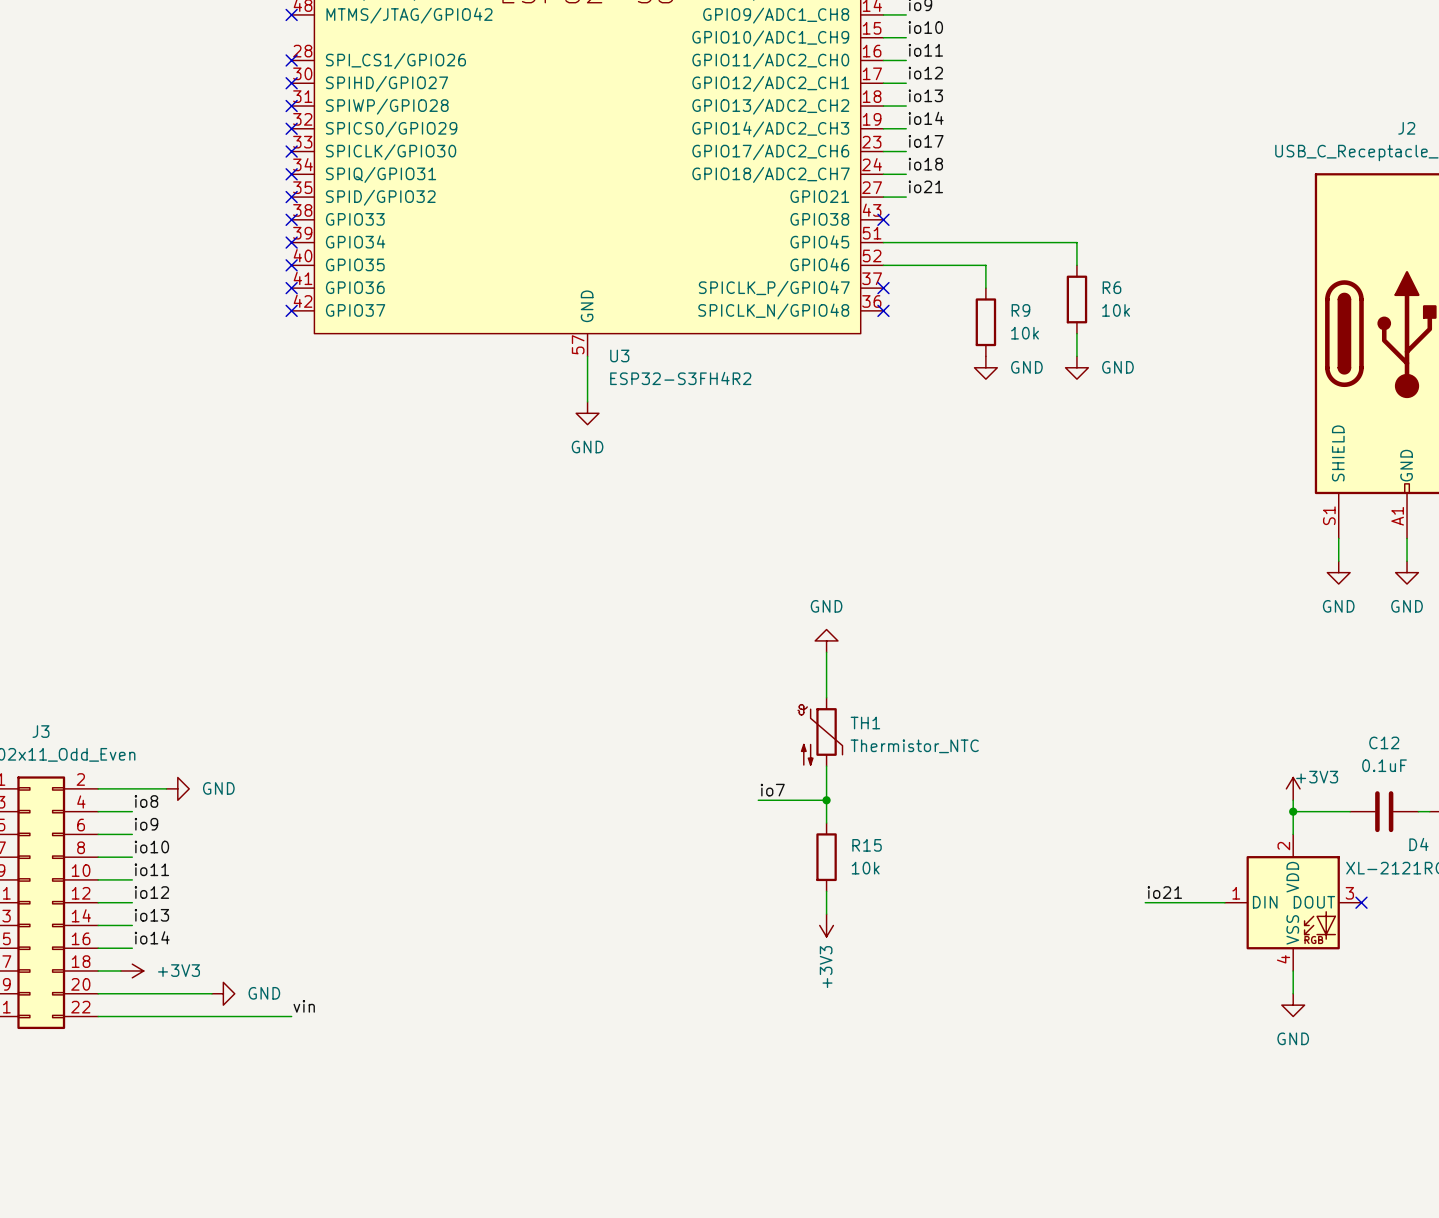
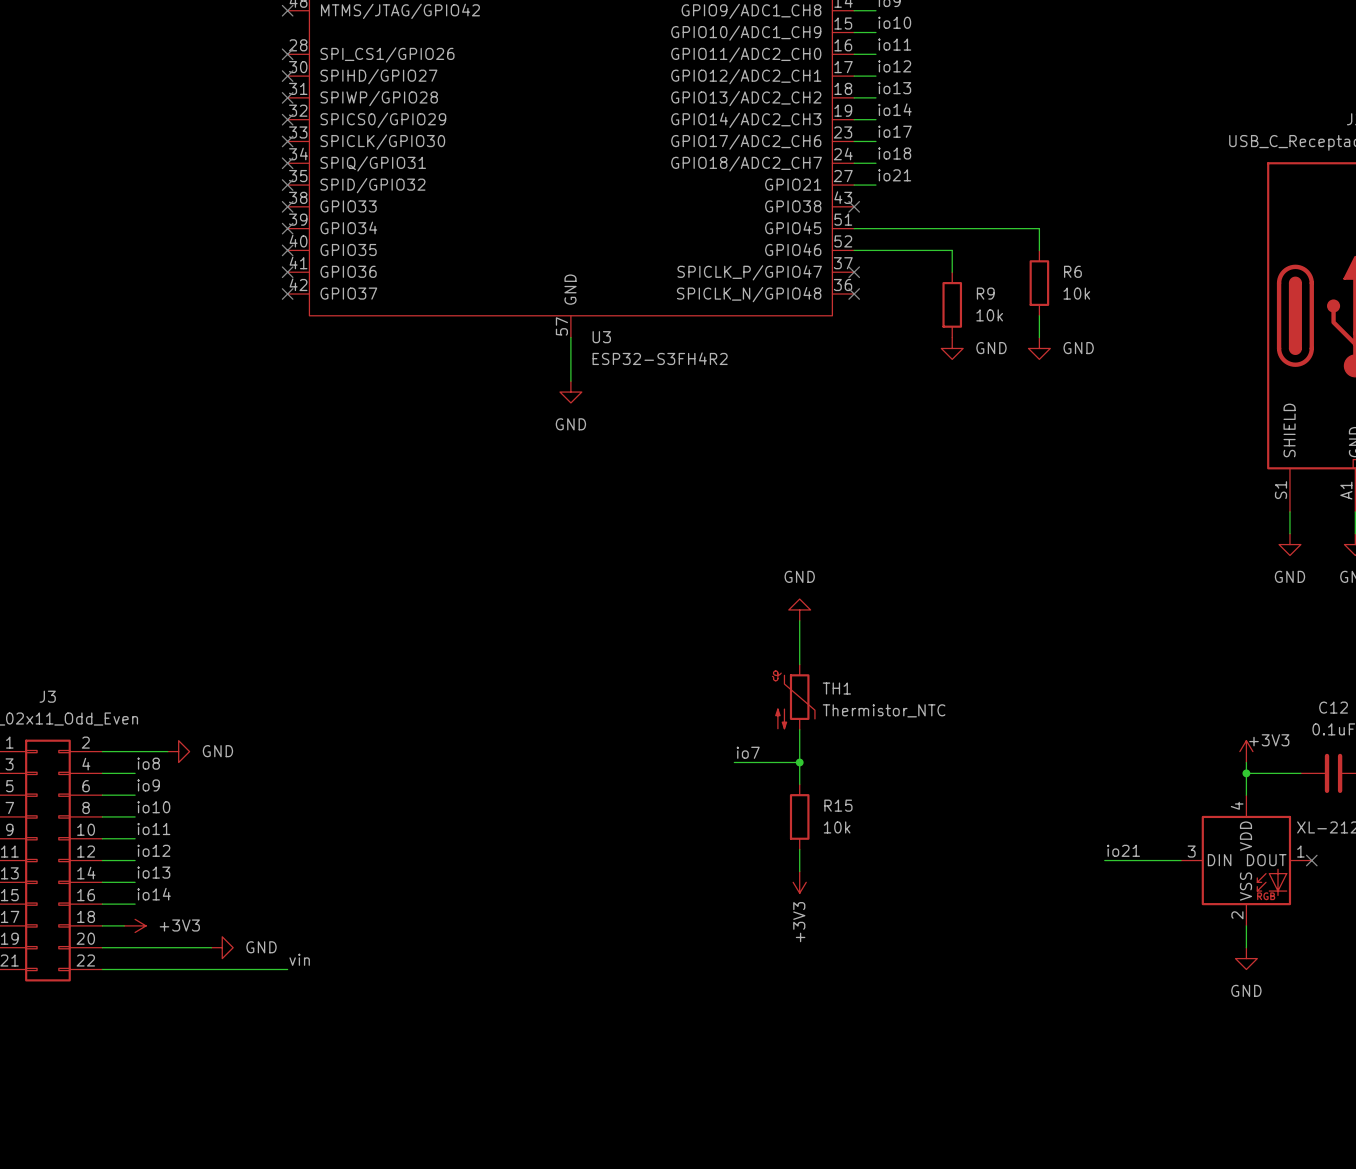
D4 pin number: 2 (1283, 846) -> 4 (1237, 805)
D4 pin number: 1 (1236, 893) -> 3 (1191, 851)
D4 pin number: 3 (1349, 893) -> 1 (1300, 851)
D4 pin number: 4 (1283, 959) -> 2 (1237, 915)

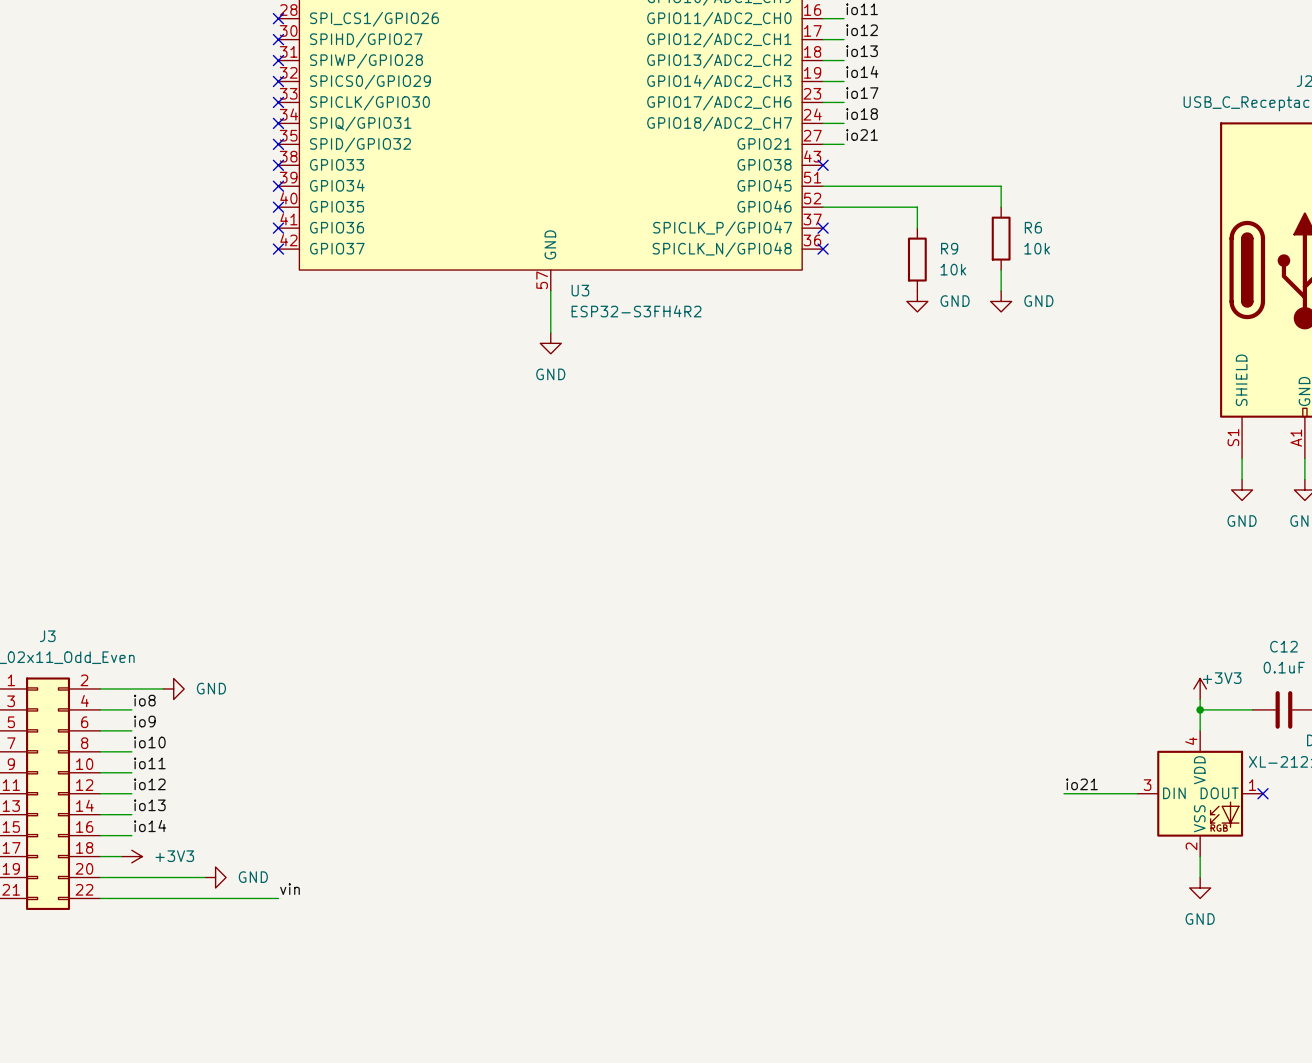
power symbol: GND (799, 609) -> none
wire: (799, 620) (799, 664) -> none
TH1: Thermistor_NTC (793, 697) -> none
wire: (799, 729) (799, 784) -> none
label: io7 (748, 752) -> none
wire: (734, 762) (799, 762) -> none
junction: (799, 762) -> none
R15: 10k (799, 816) -> none
wire: (799, 849) (799, 871) -> none
power symbol: +3V3 (799, 882) -> none

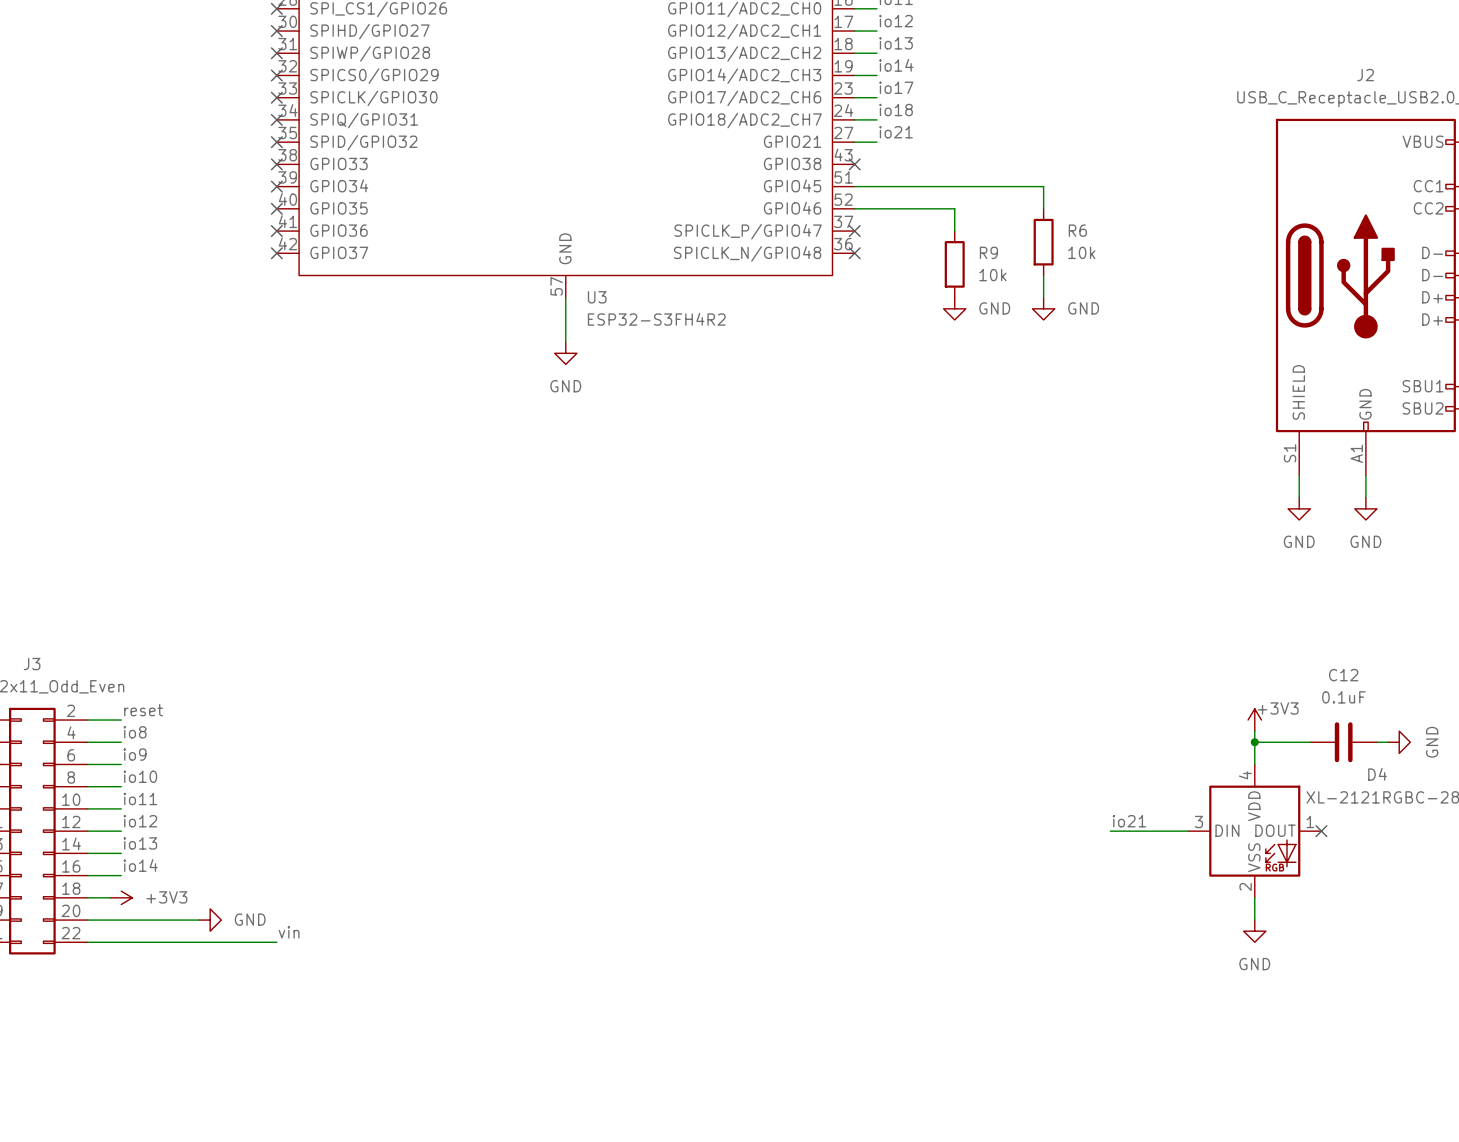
label: none -> reset (143, 710)
wire: (131, 688) (163, 688) -> none
power symbol: GND (173, 688) -> none

